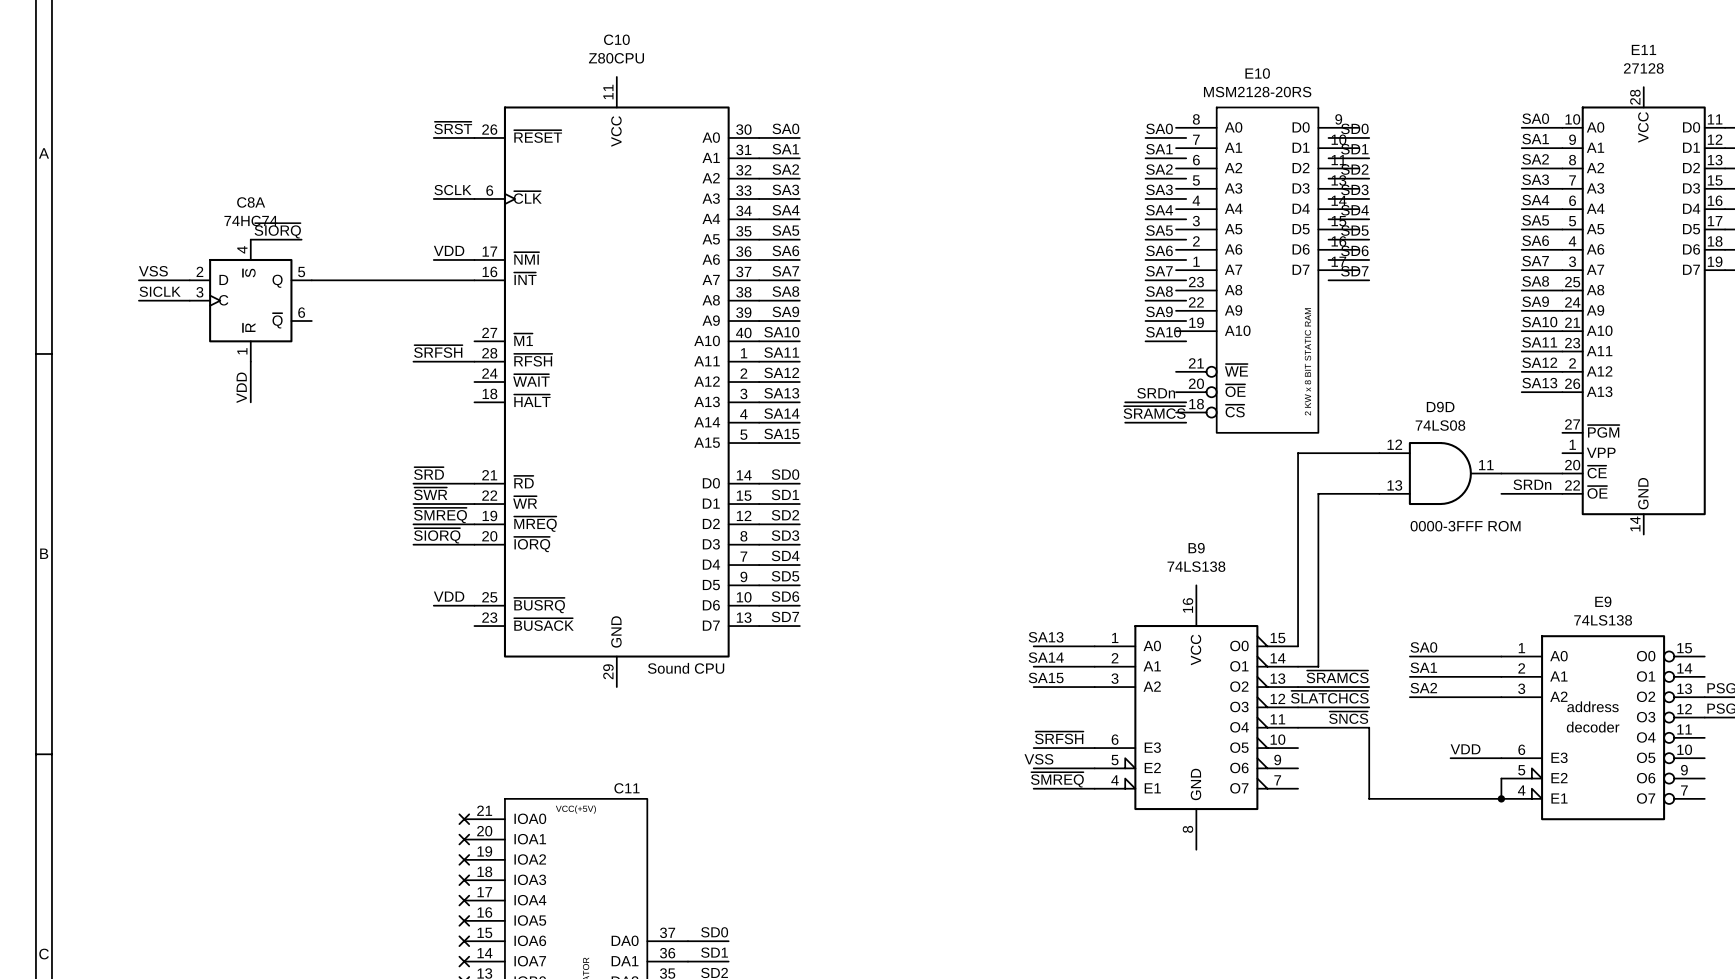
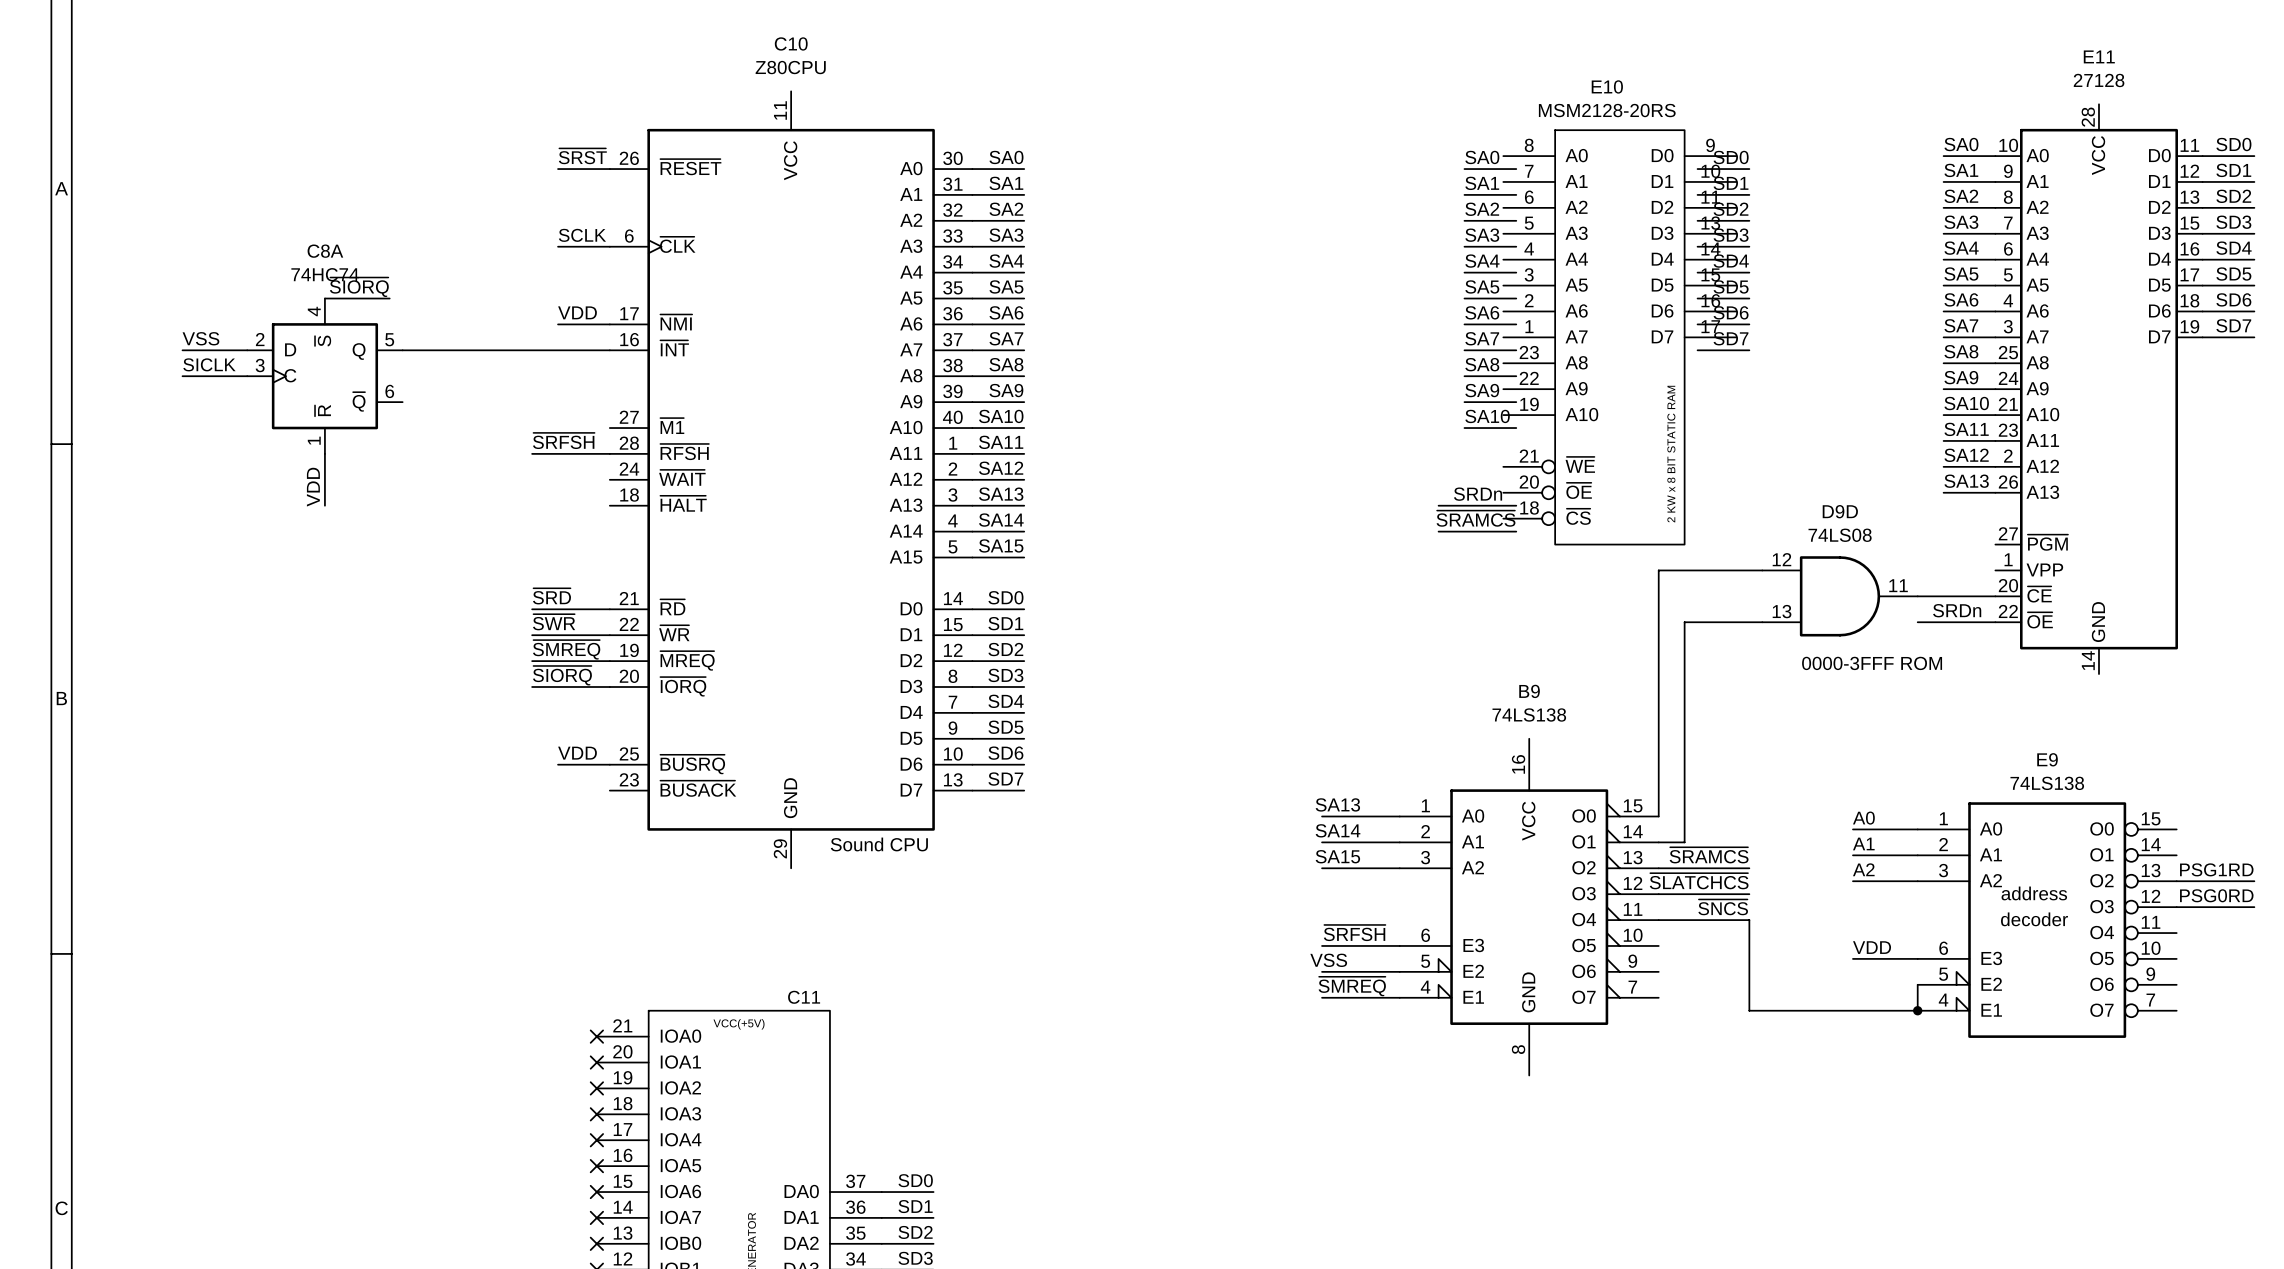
label: SA0 (1423, 647) -> none
label: none -> A0 (1863, 818)
wire: (1409, 656) (1450, 656) -> none
label: SA1 (1423, 667) -> none
label: none -> A1 (1863, 843)
wire: (1409, 676) (1450, 676) -> none
label: SA2 (1423, 688) -> none
label: none -> A2 (1863, 869)
wire: (1409, 697) (1450, 697) -> none

